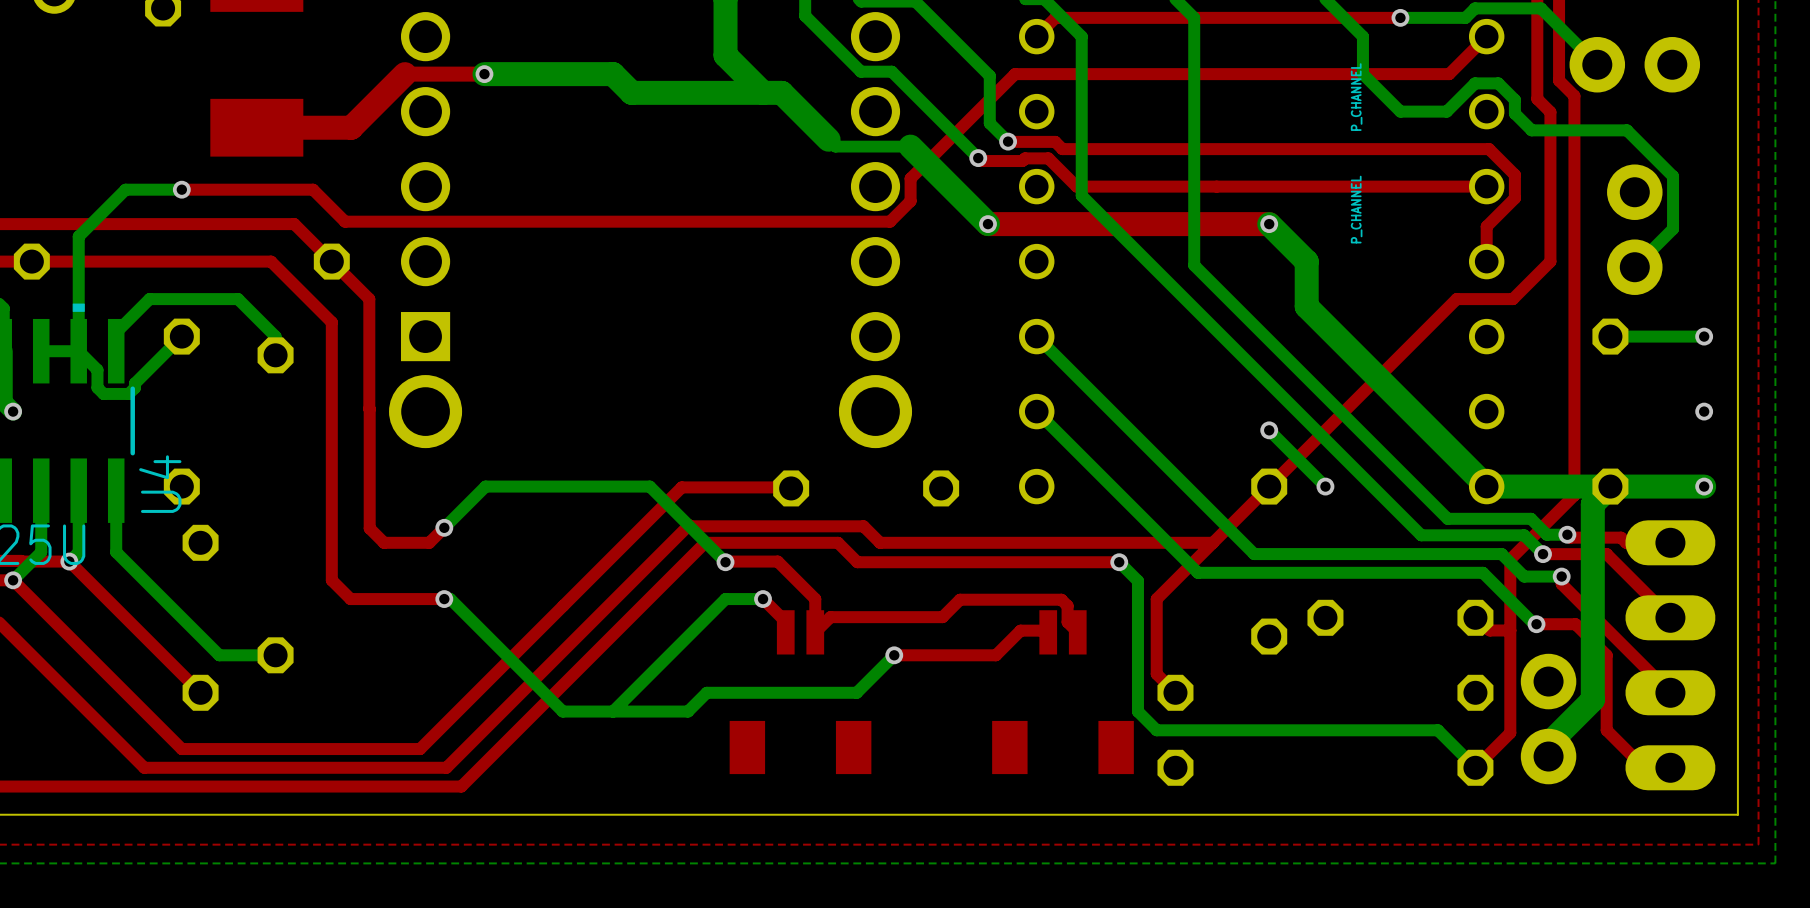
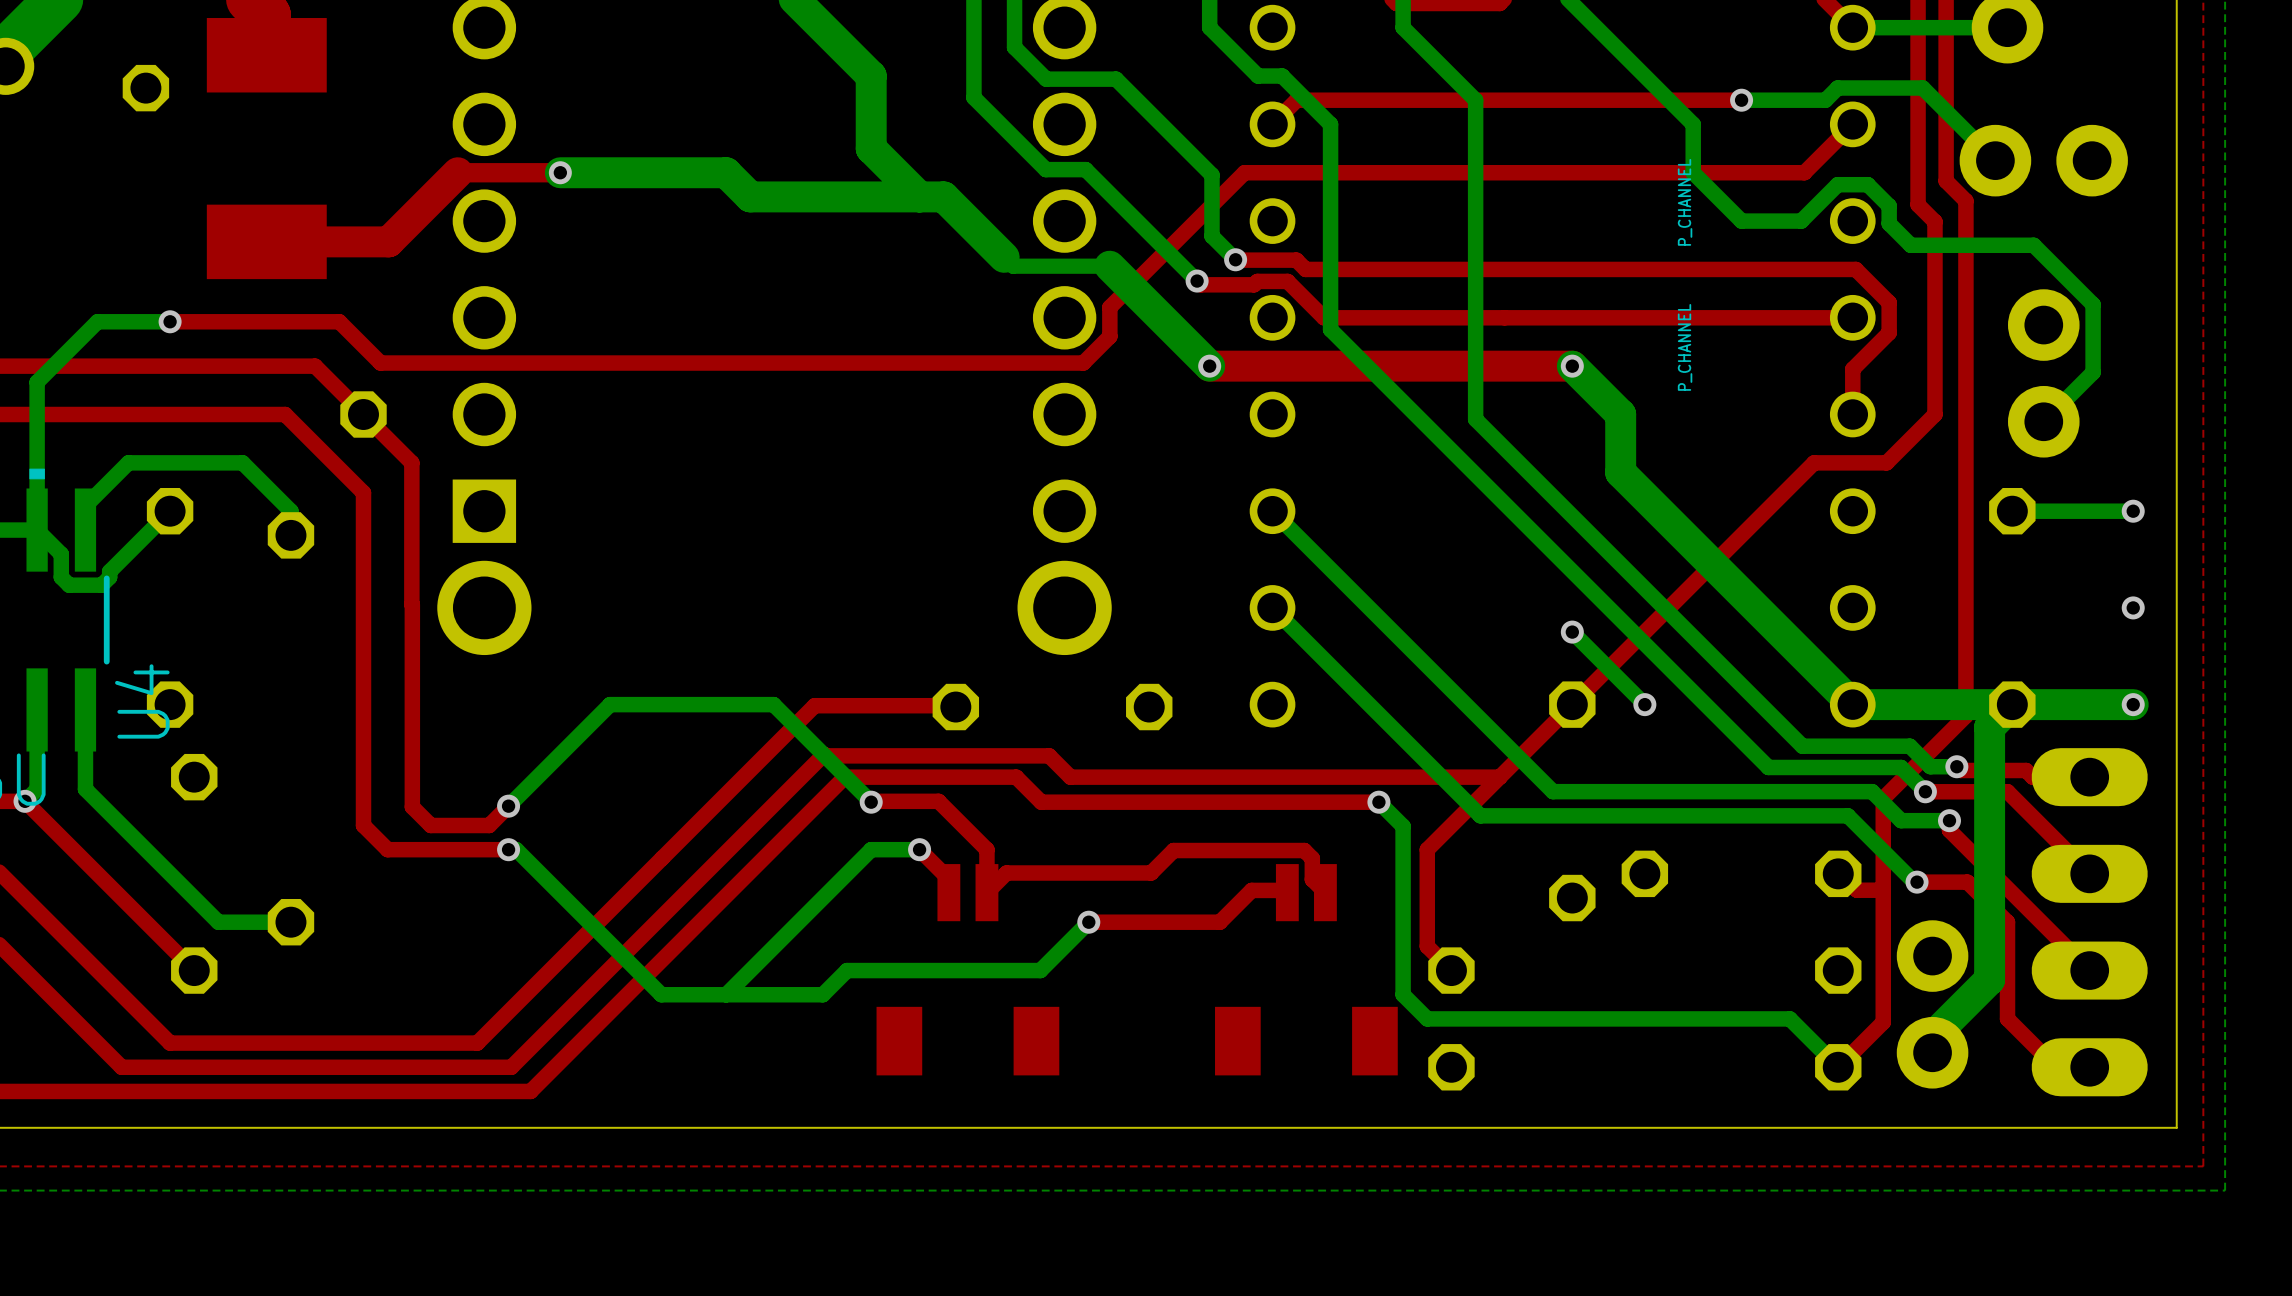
bottom track: (523, 486) (485, 486) (444, 527) -> (610, 704) (508, 806)
top track: (444, 527) (429, 542) (384, 542) (369, 528) -> (508, 806) (489, 825) (430, 825) (412, 806) (412, 758)
via position: (444, 527) -> (508, 806)

